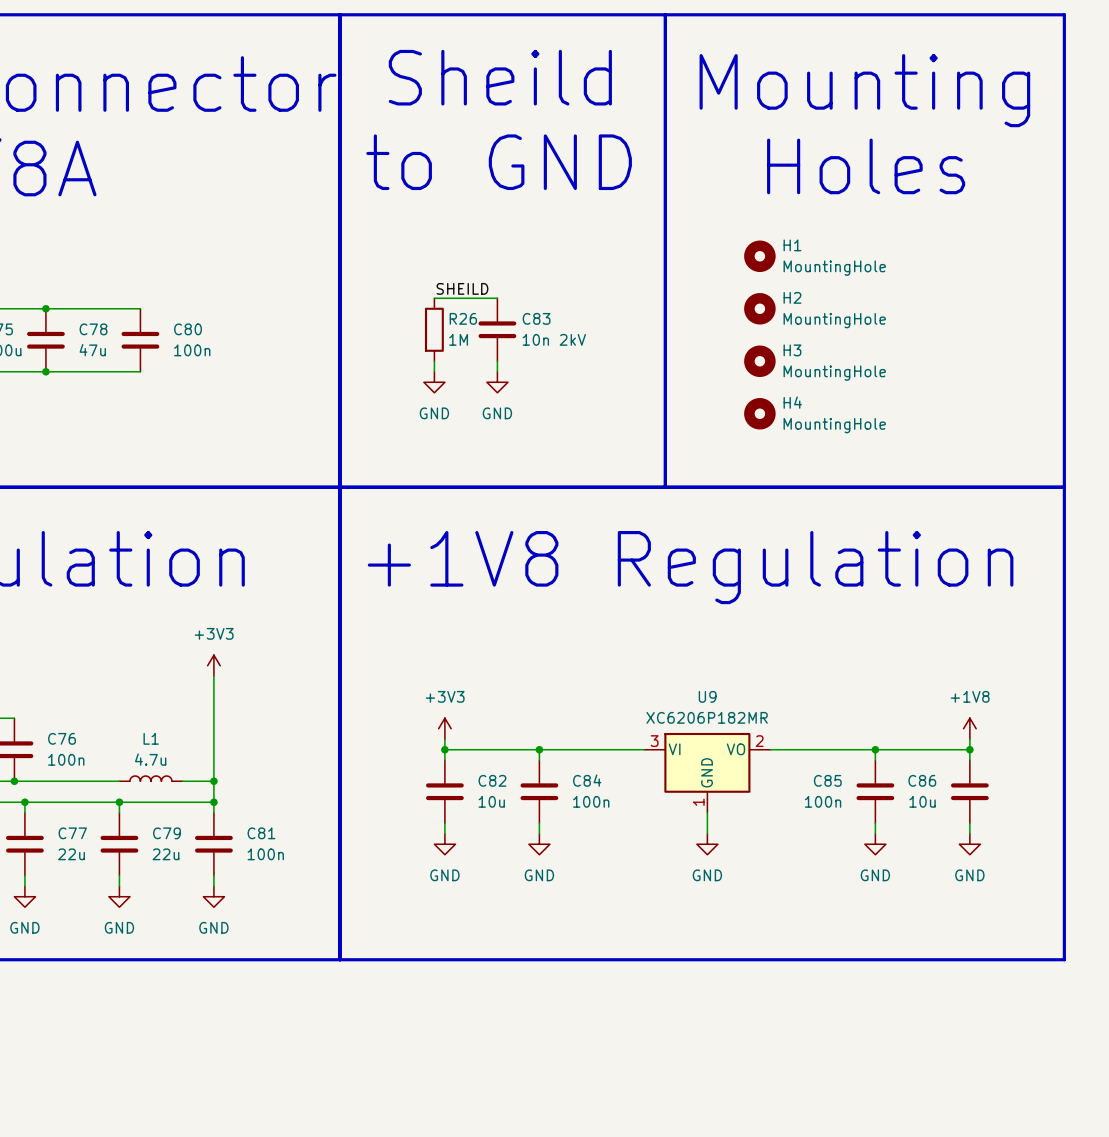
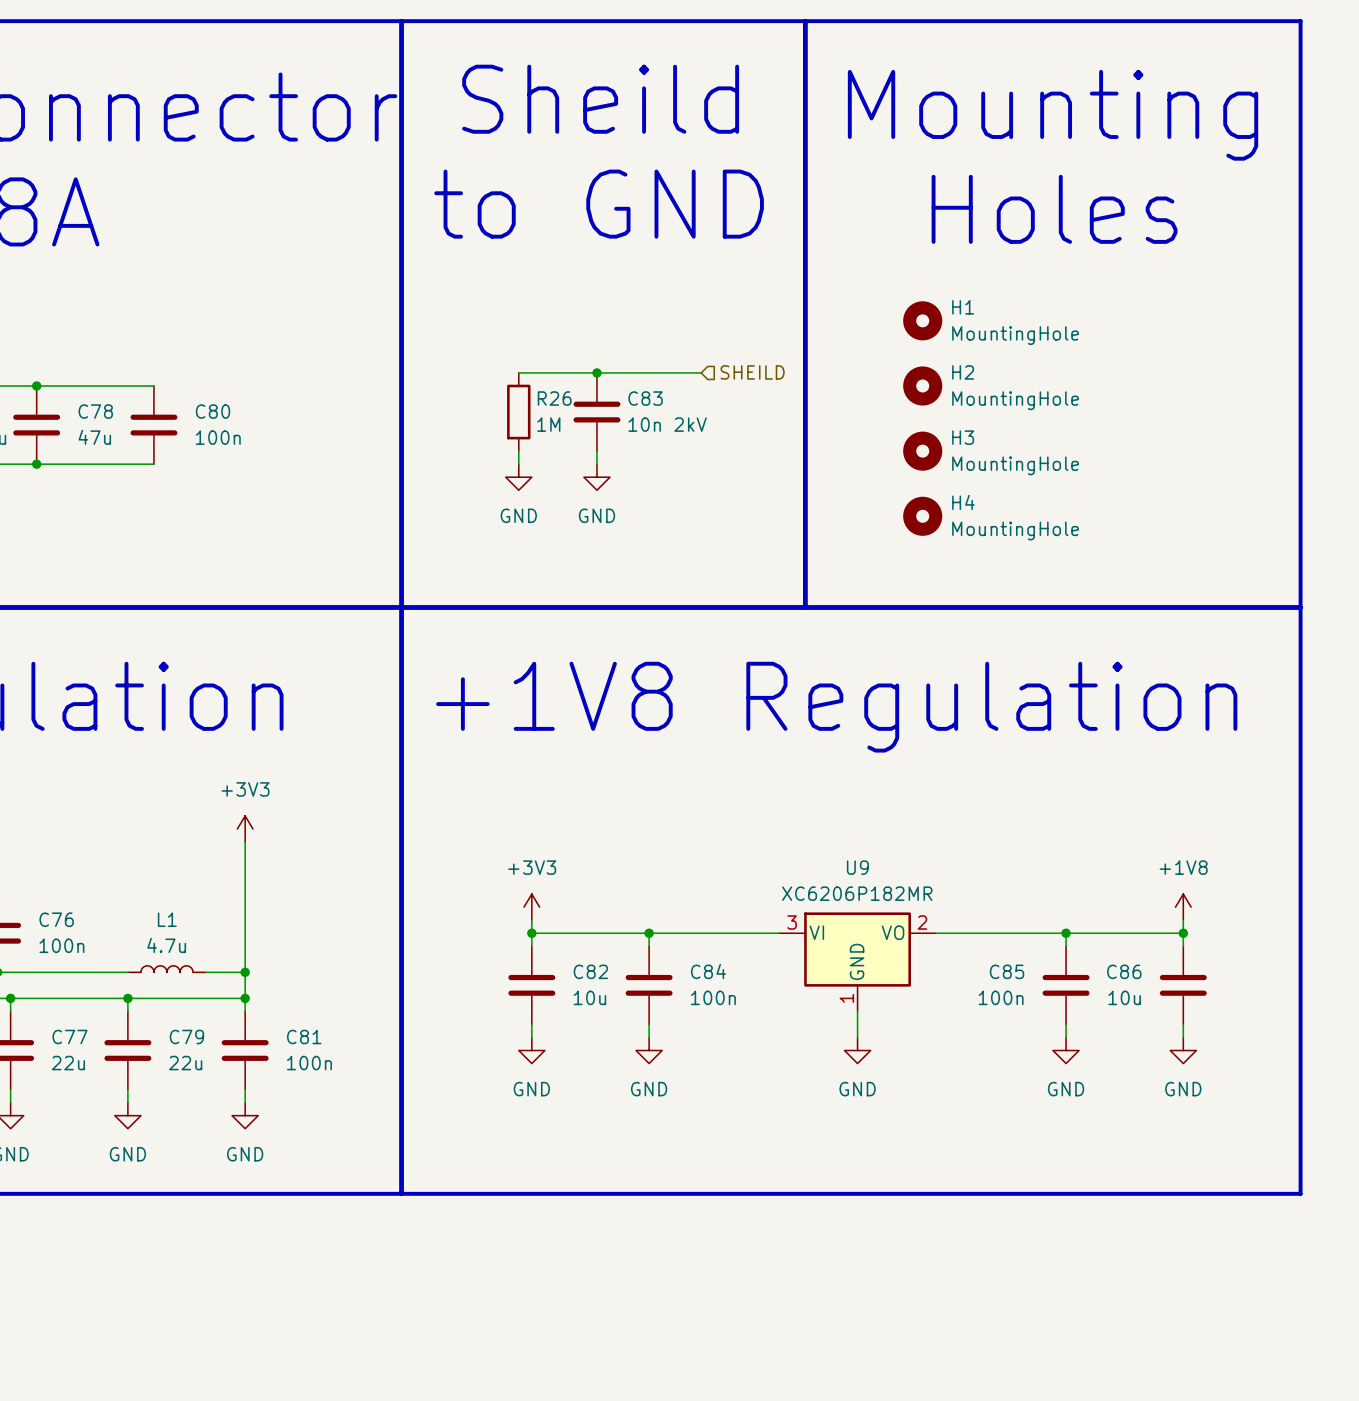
label: SHEILD (462, 288) -> none
hierarchical label: none -> SHEILD (752, 372)
wire: none -> (596, 372) (701, 372)
junction: none -> (596, 372)

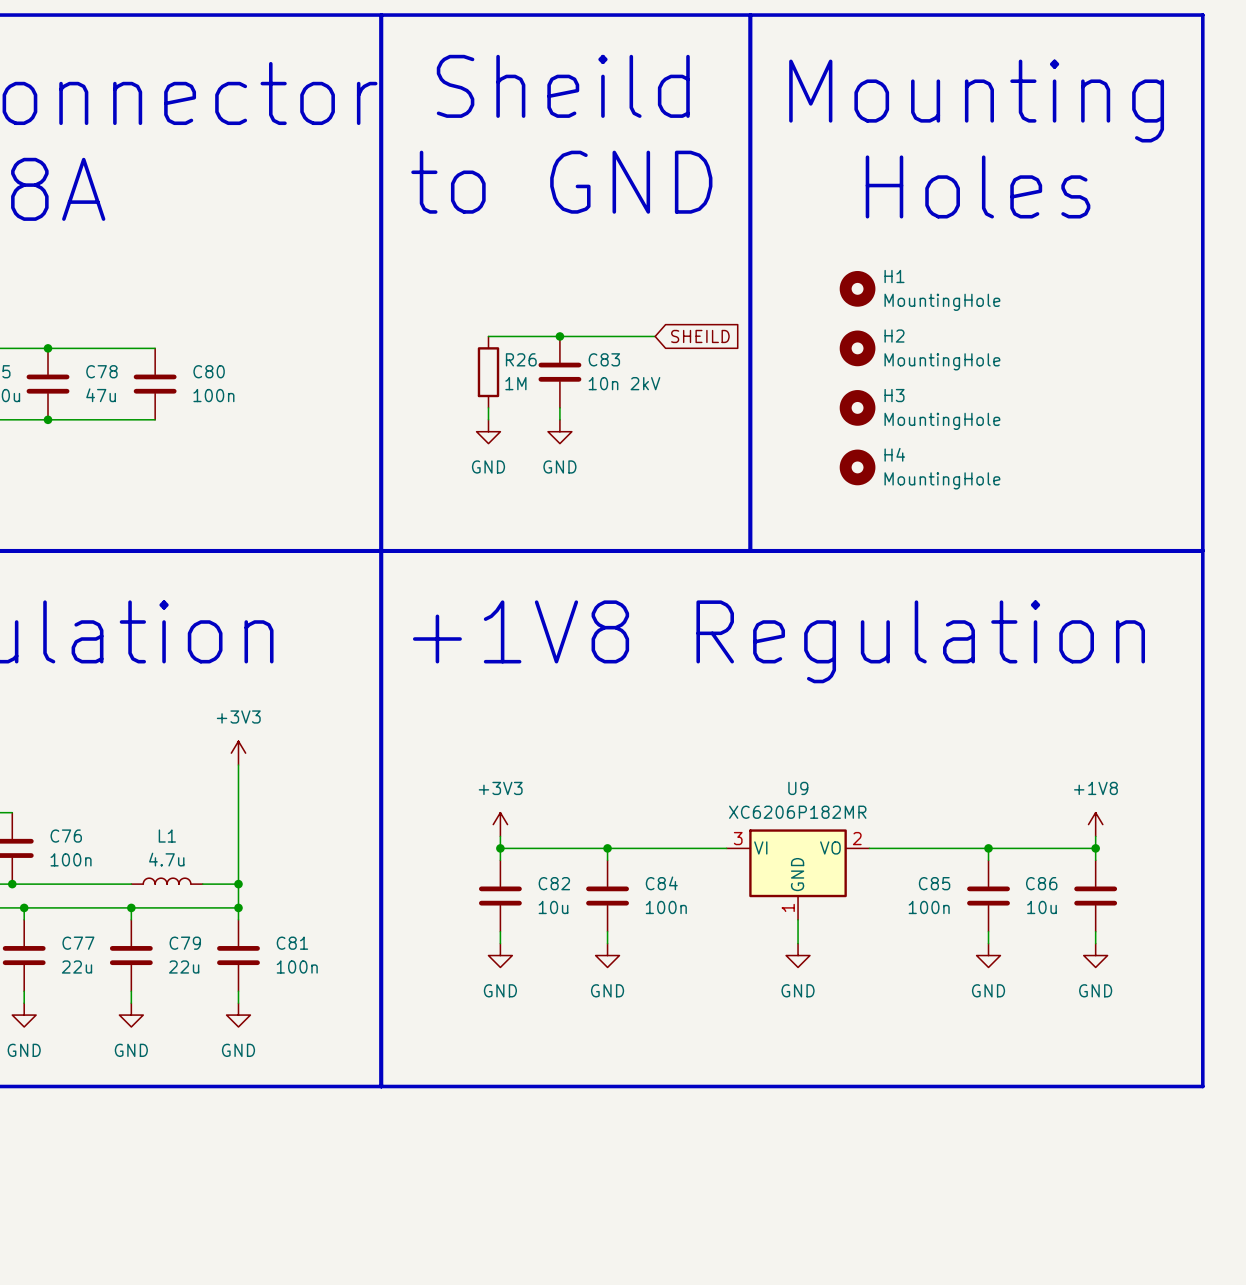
global label: none -> SHEILD (700, 336)
hierarchical label: SHEILD (752, 372) -> none

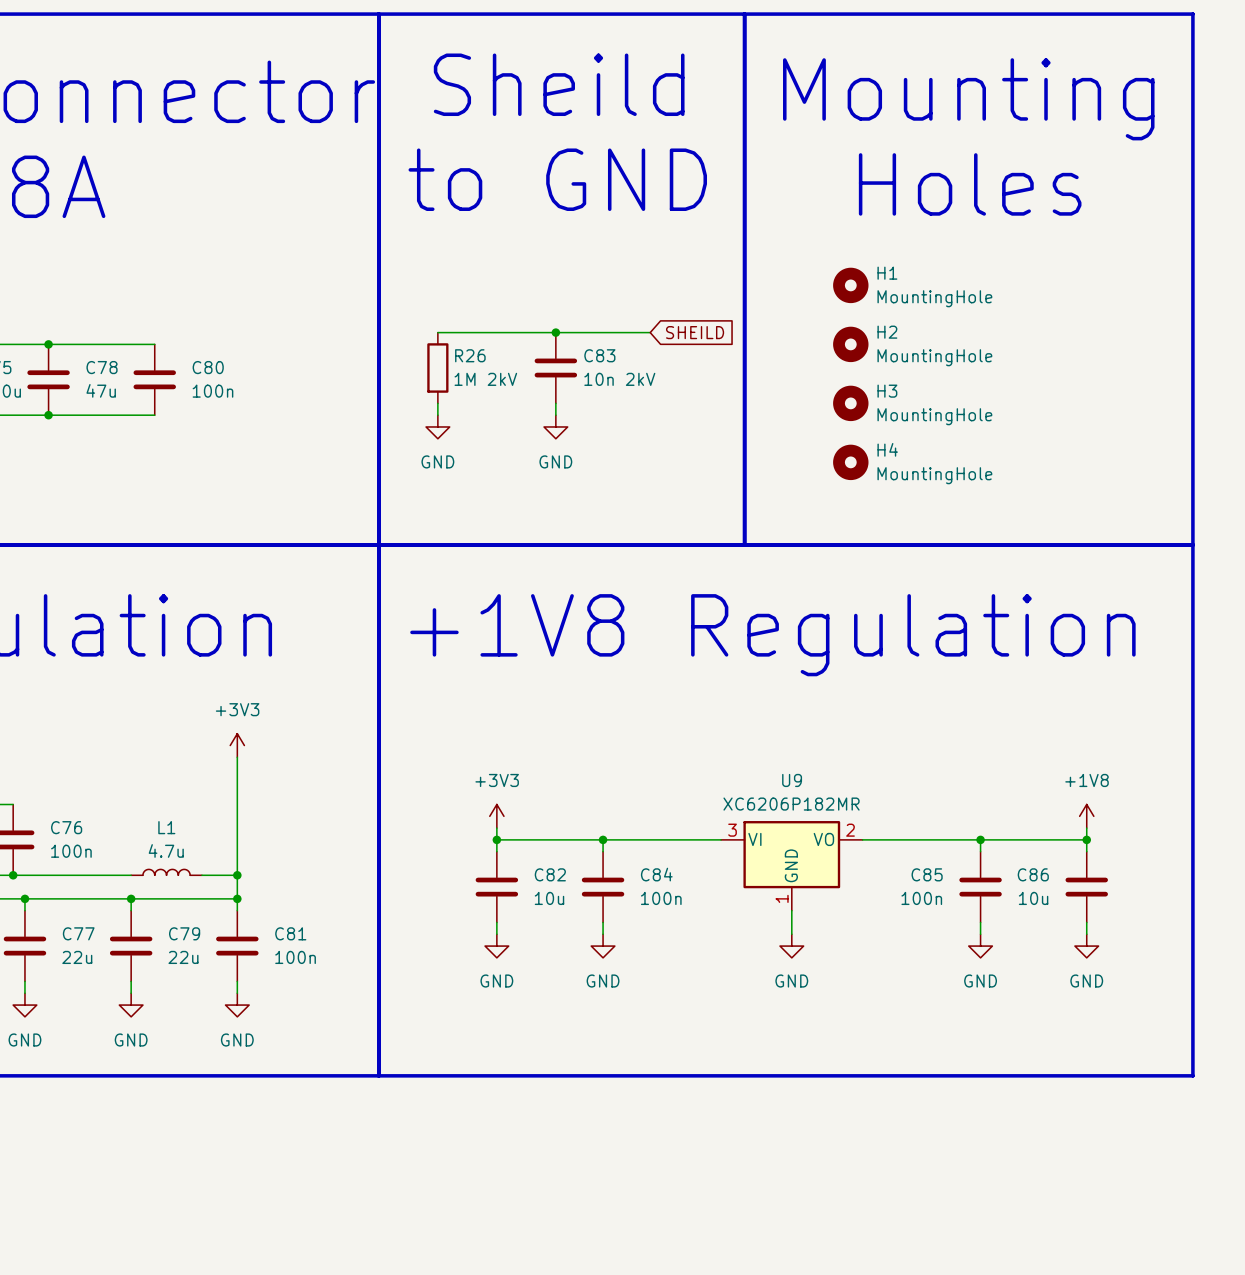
wire: none -> (437, 332) (485, 332)
R26 position: (488, 372) -> (437, 368)
R26 value: 1M (515, 383) -> 1M 2kV (485, 379)
wire: (488, 407) (488, 419) -> (437, 403) (437, 415)
power symbol position: GND (488, 431) -> GND (437, 426)

